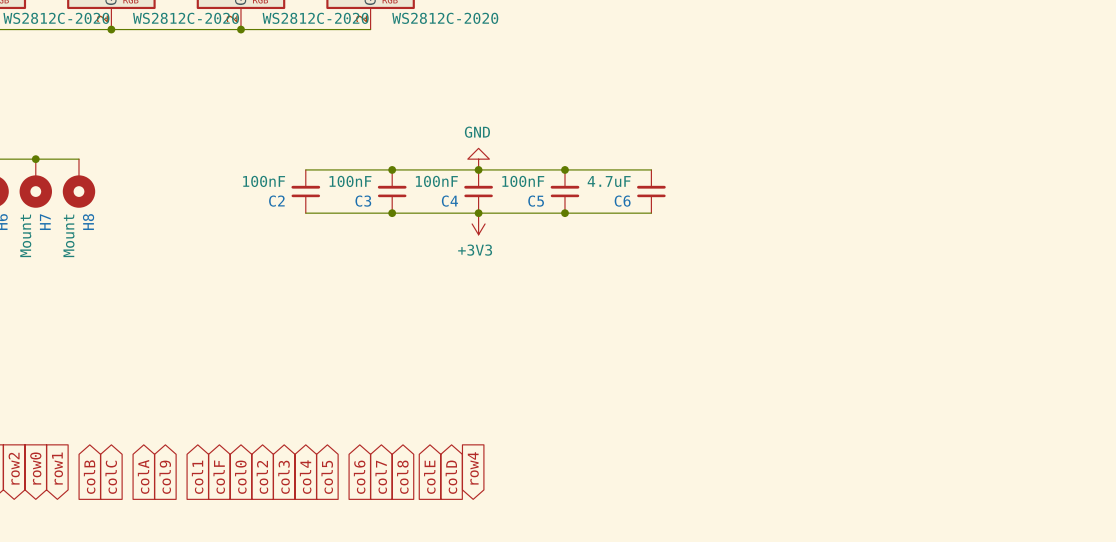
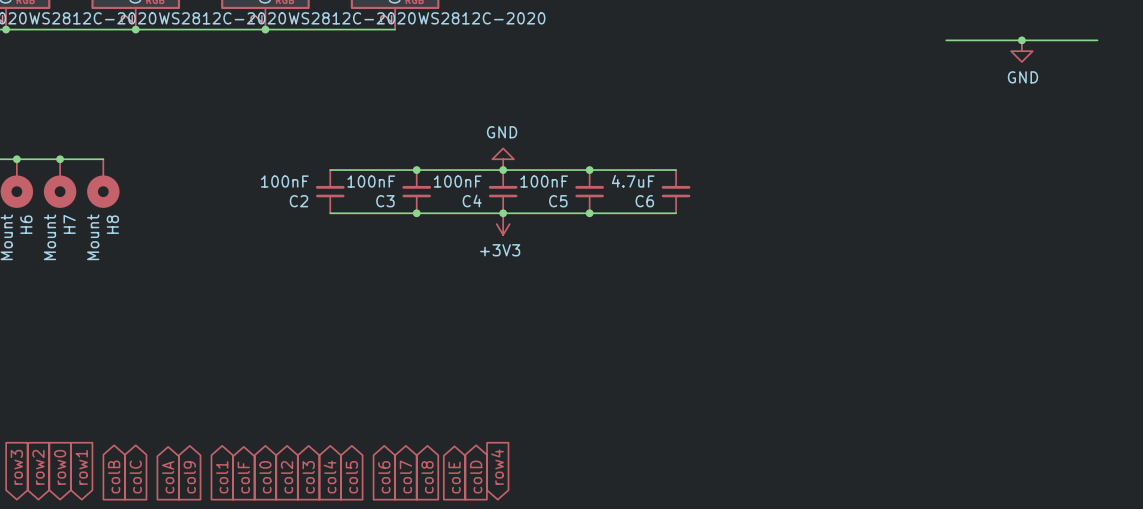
wire: none -> (946, 40) (1097, 40)
junction: none -> (1021, 40)
power symbol: none -> GND (1021, 51)

